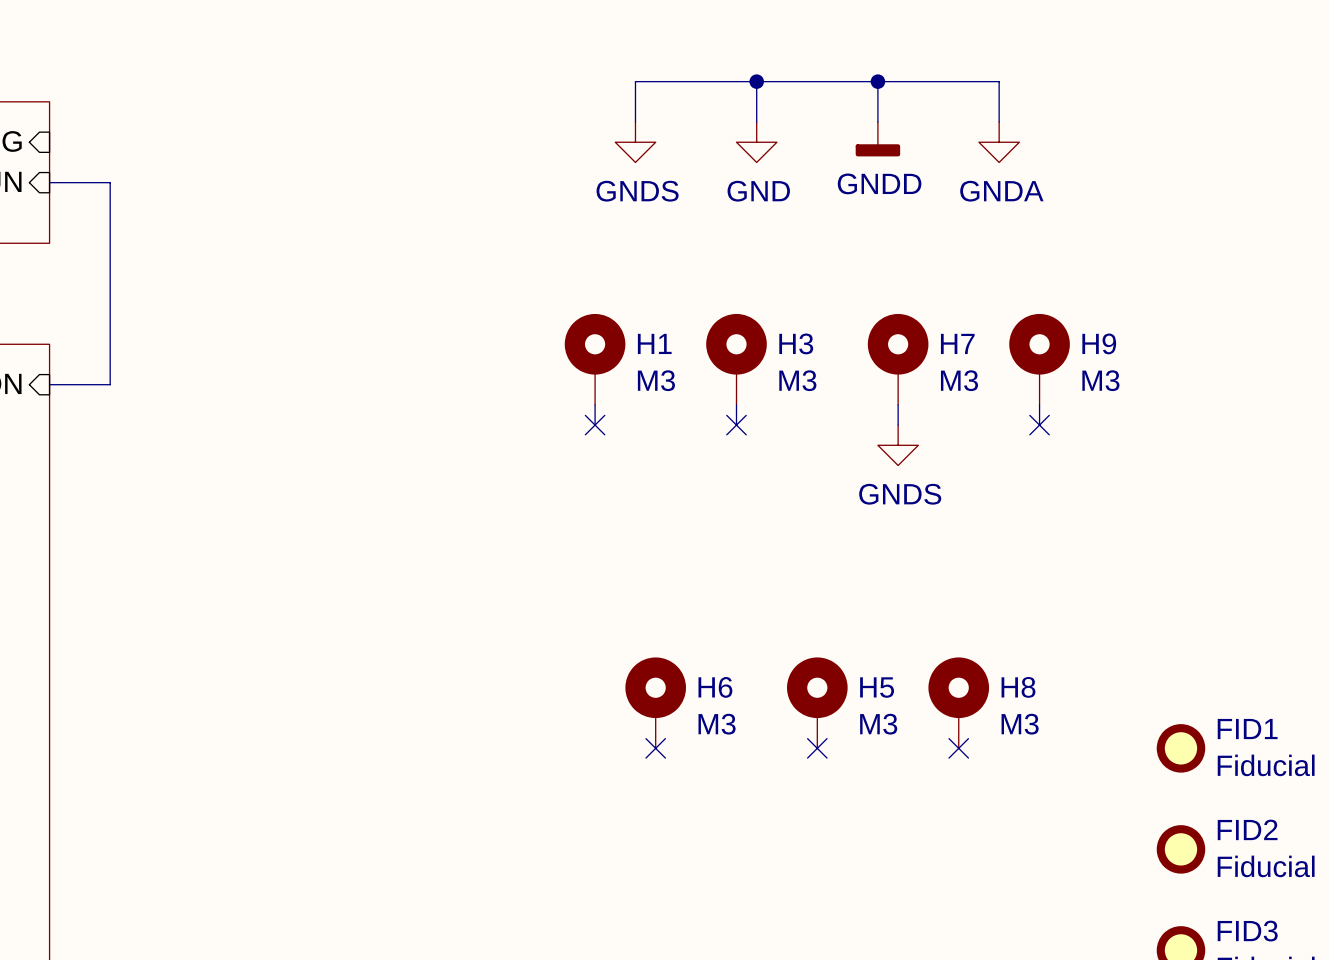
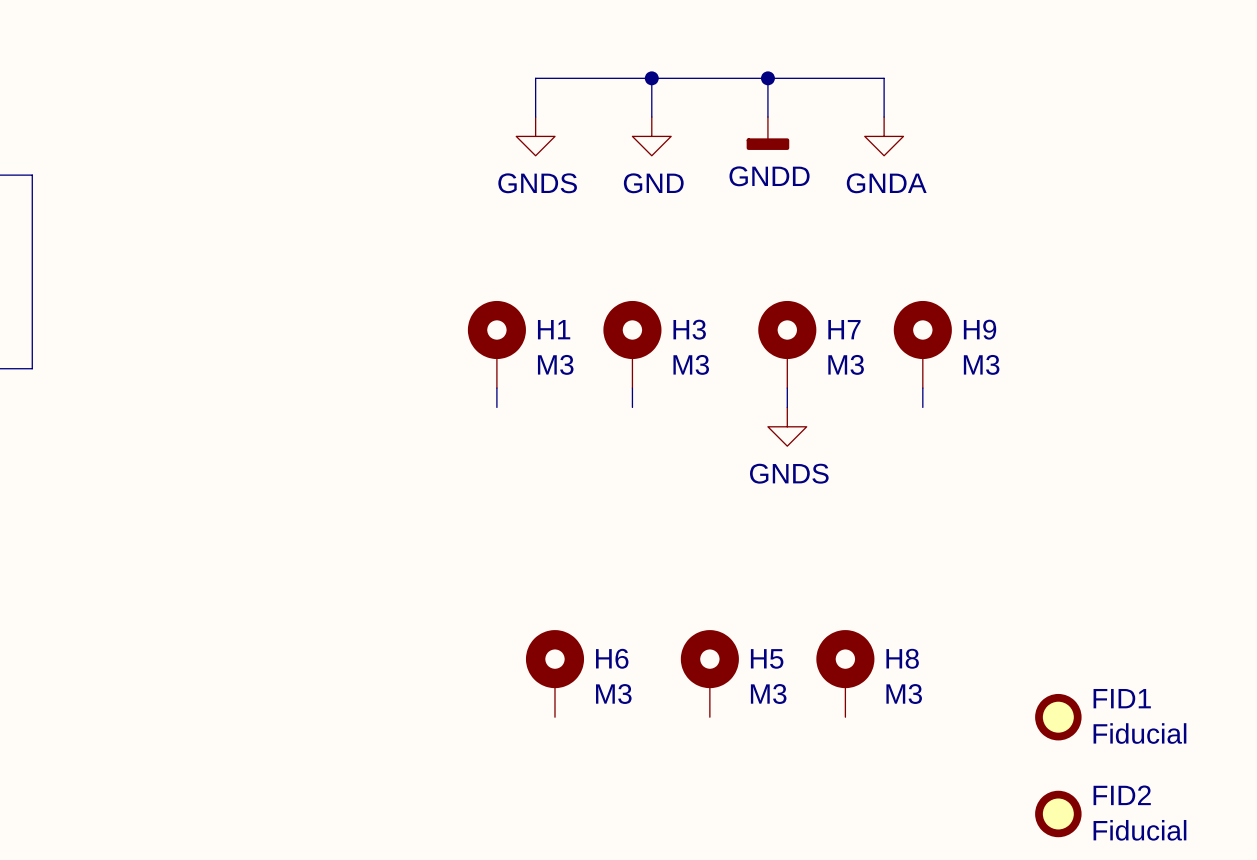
no-connect mark: (595, 425) -> none
no-connect mark: (736, 425) -> none
no-connect mark: (1039, 425) -> none
no-connect mark: (655, 748) -> none
no-connect mark: (817, 748) -> none
no-connect mark: (958, 748) -> none

